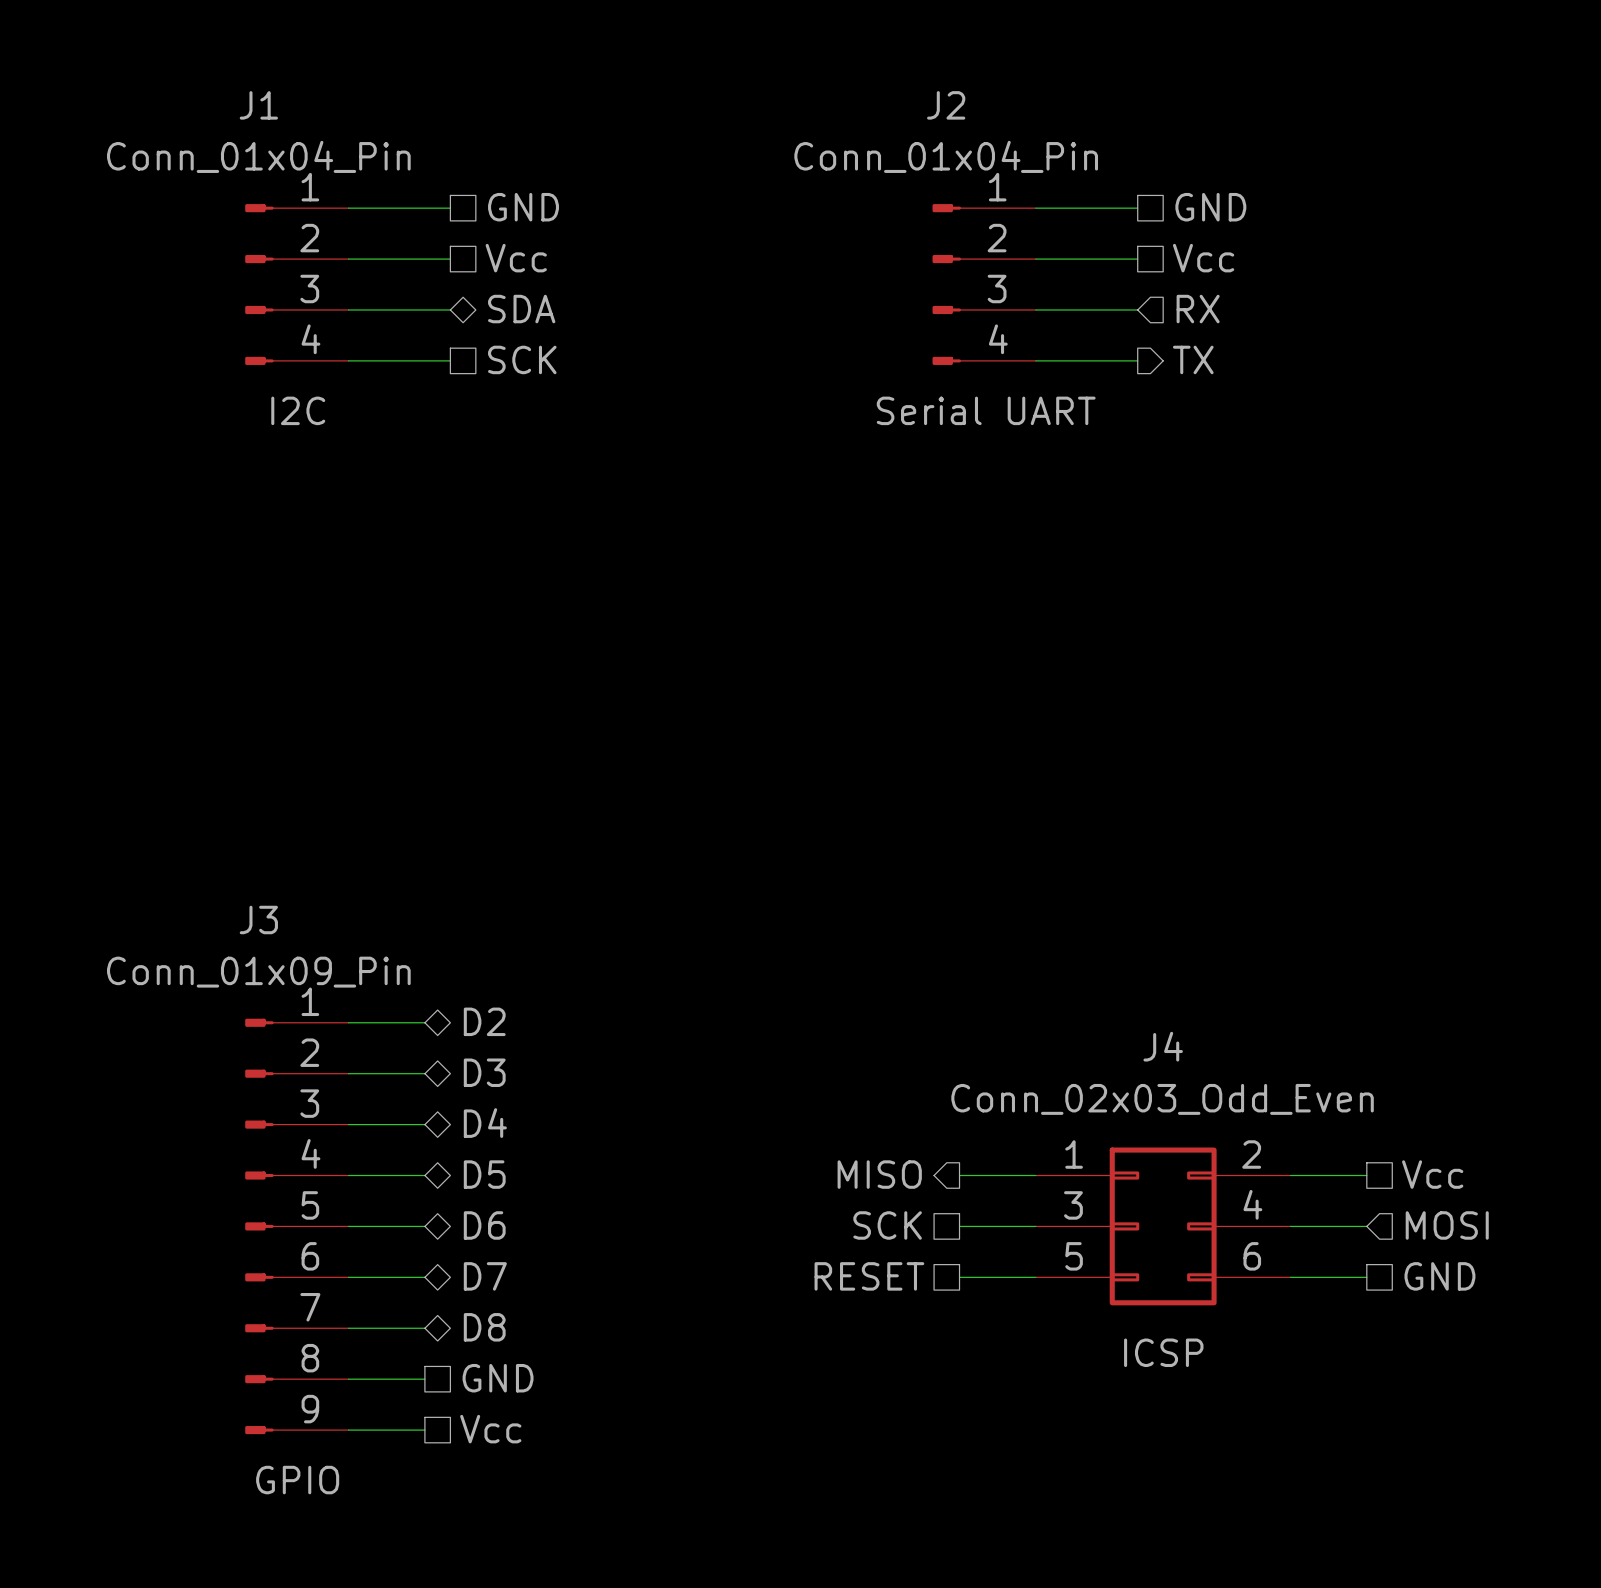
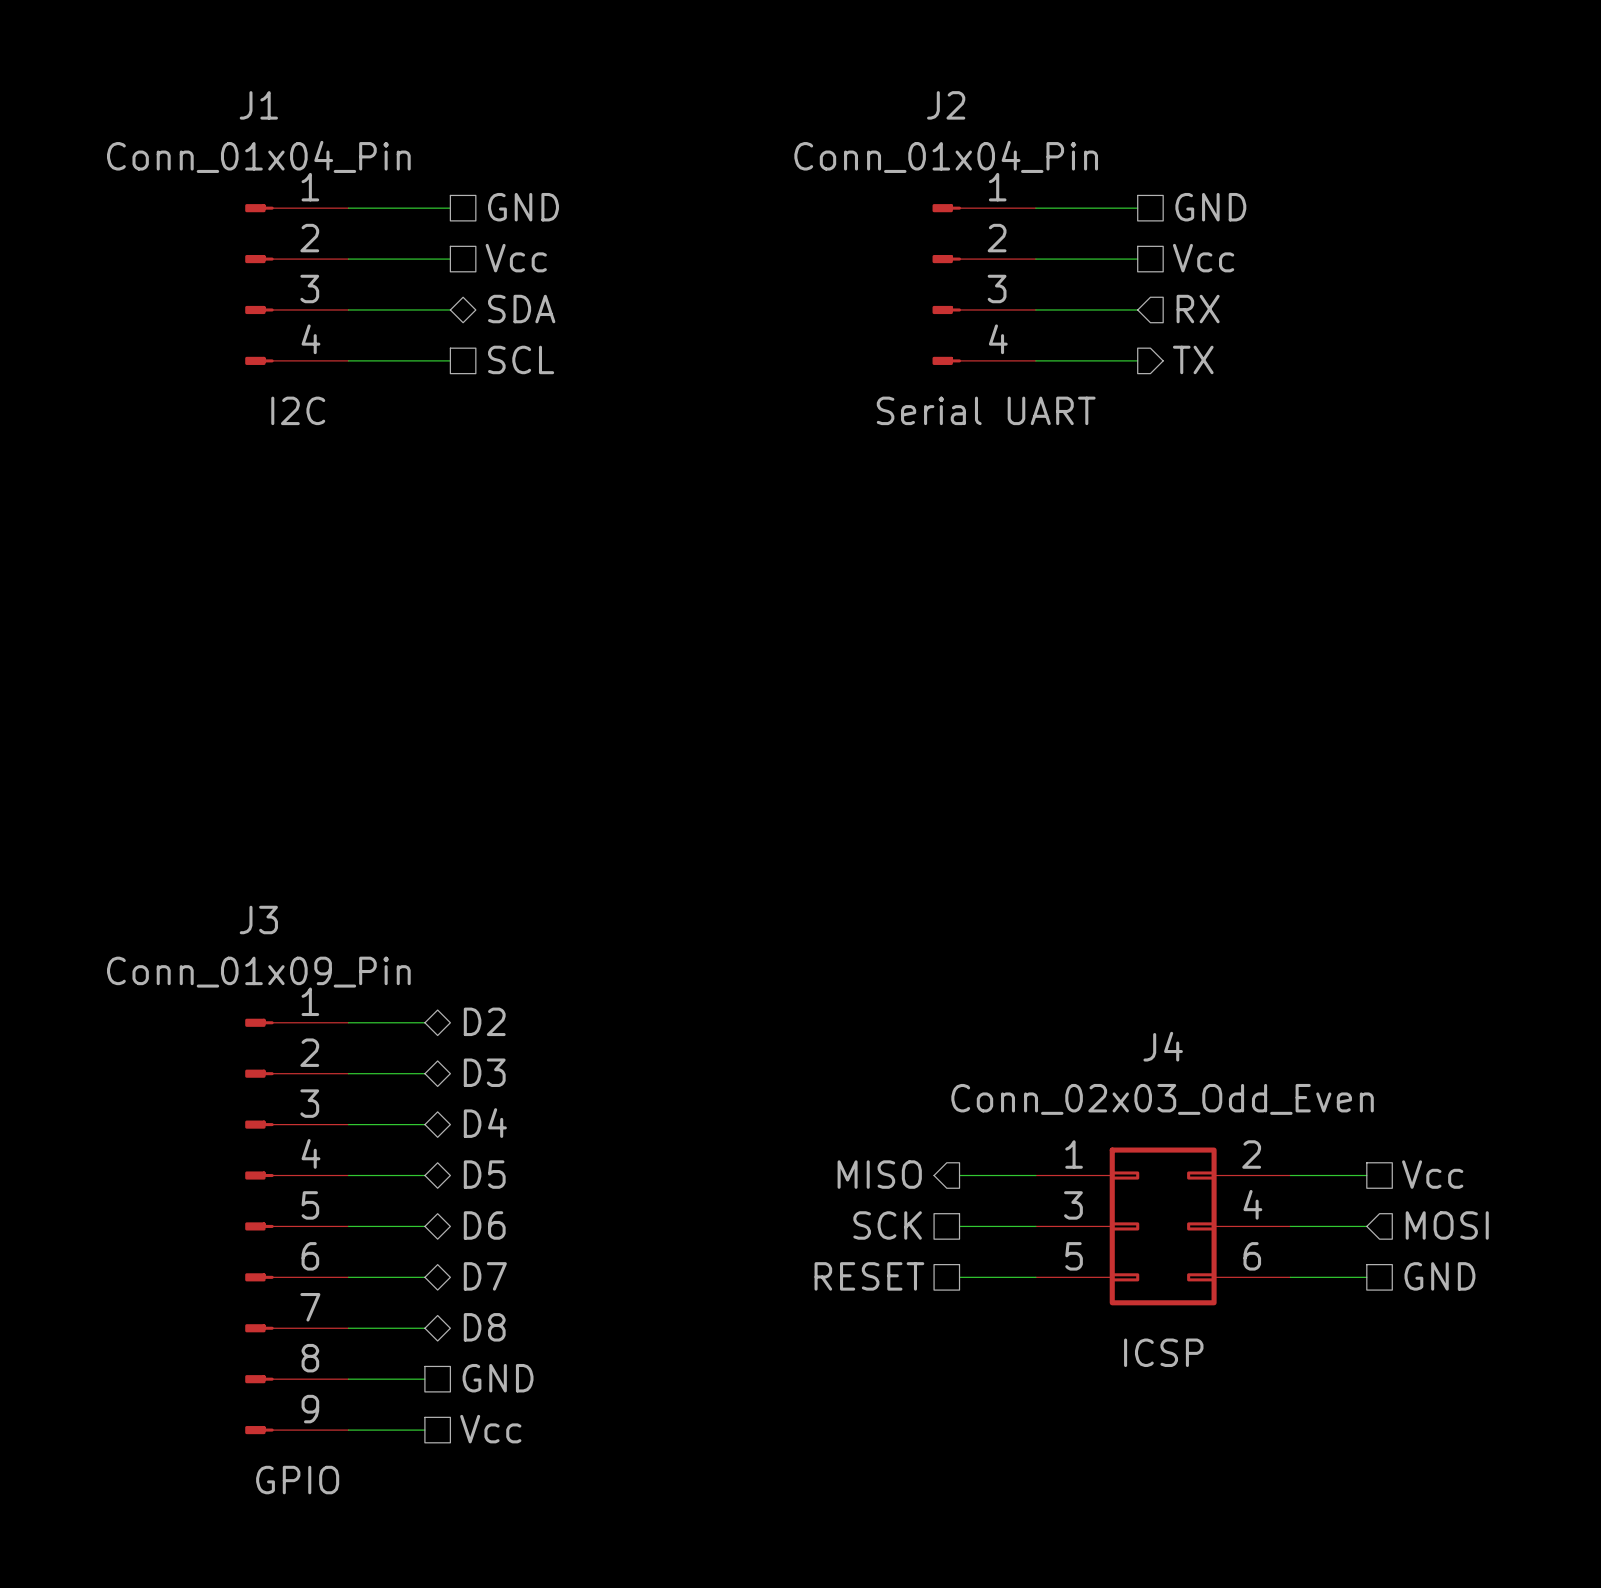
hierarchical label: SCK (522, 359) -> SCL (521, 359)

